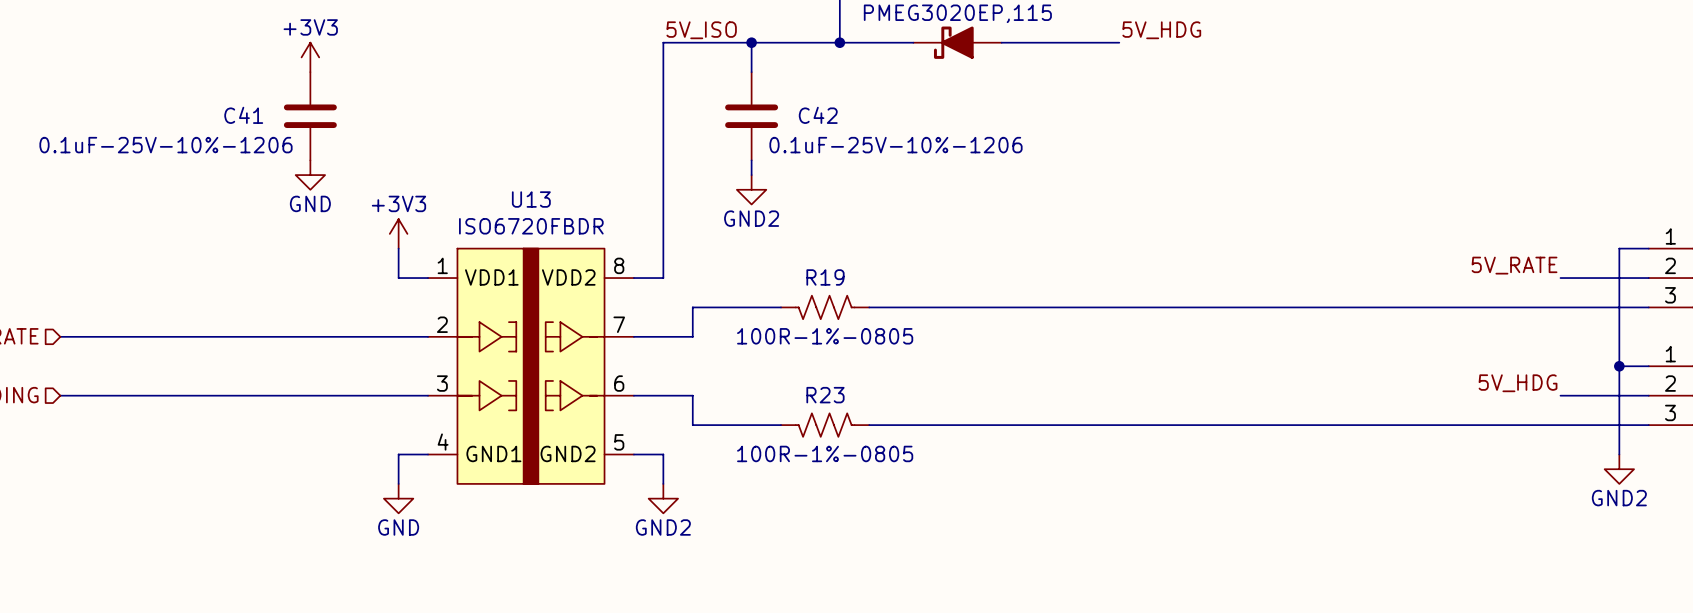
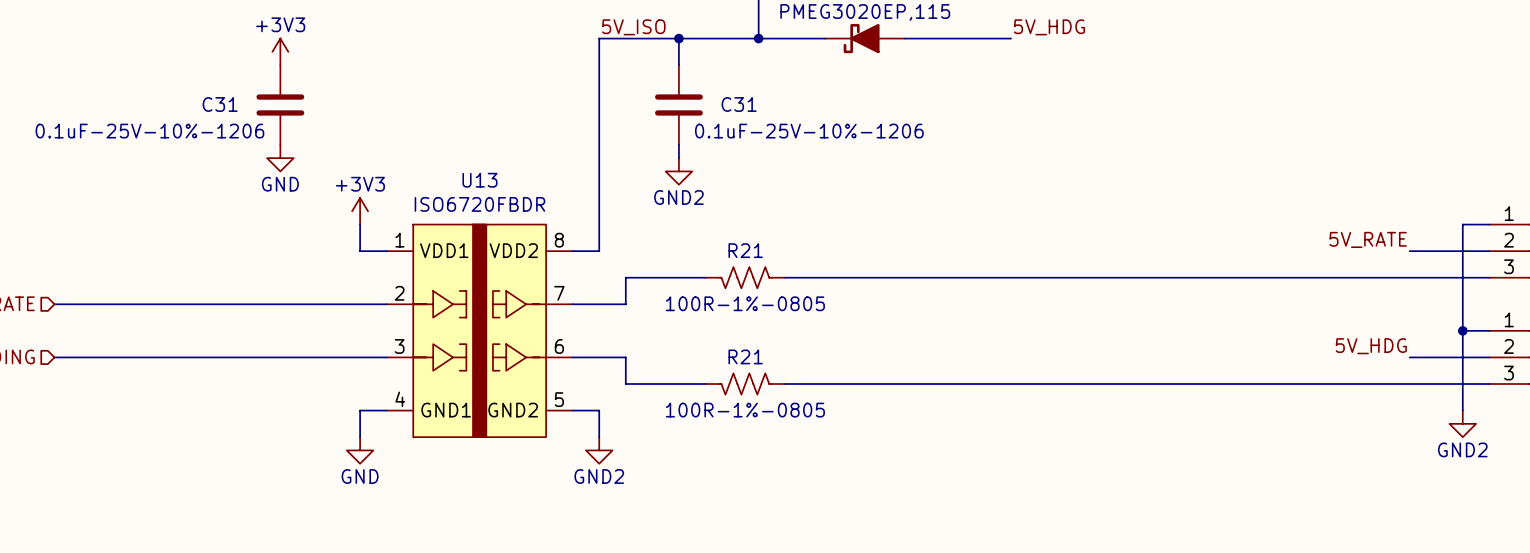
C41 name: C41 (243, 115) -> C31 (220, 104)
C42 name: C42 (818, 115) -> C31 (739, 104)
R19 name: R19 (825, 277) -> R21 (745, 250)
R23 name: R23 (825, 395) -> R21 (745, 356)

